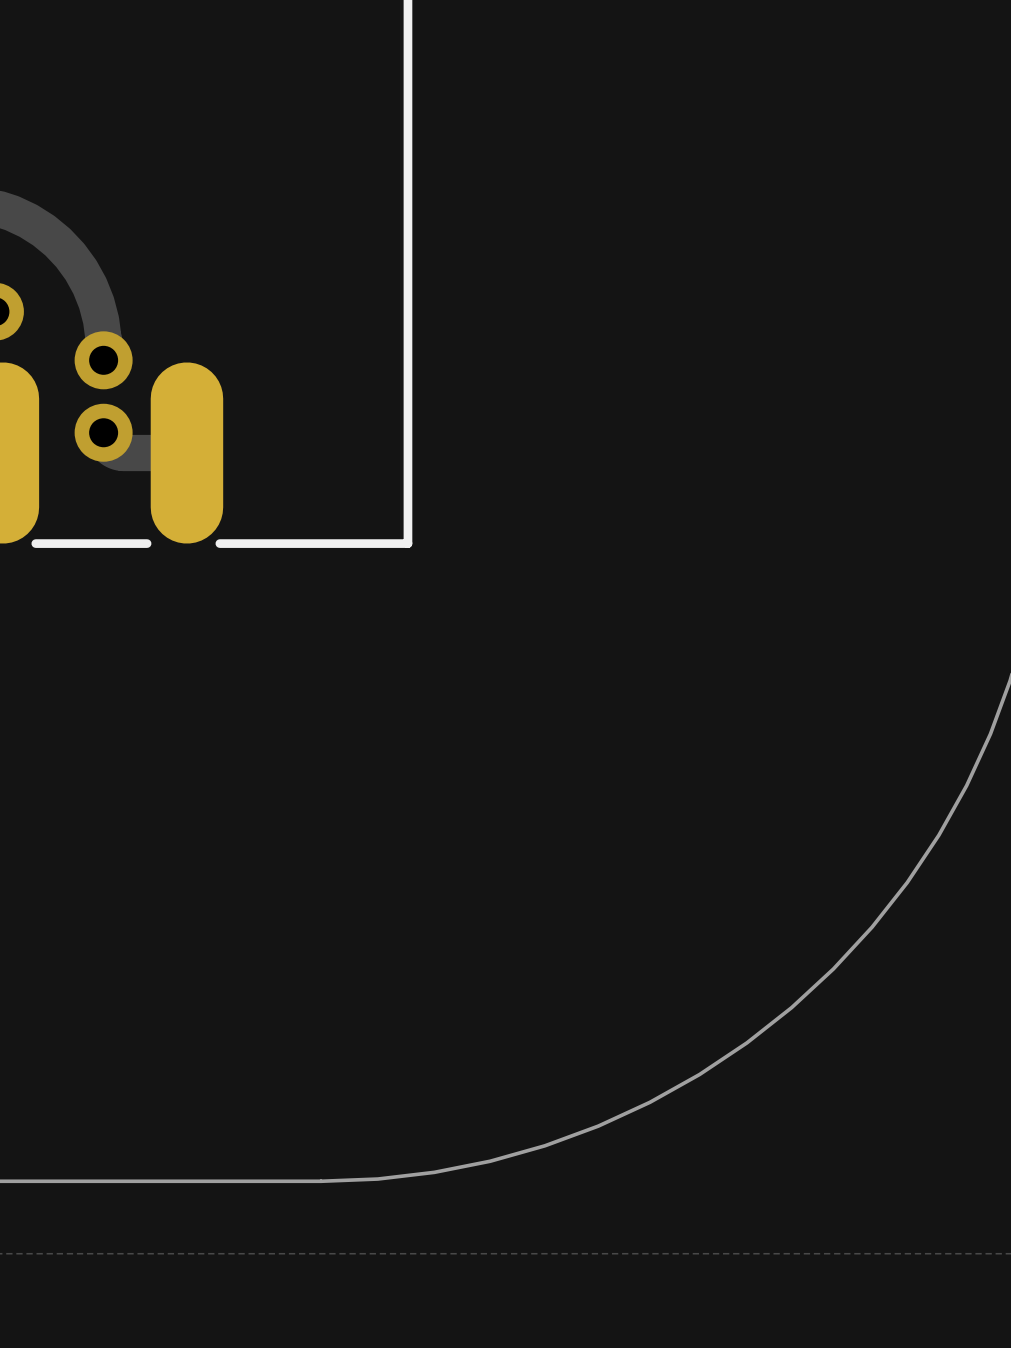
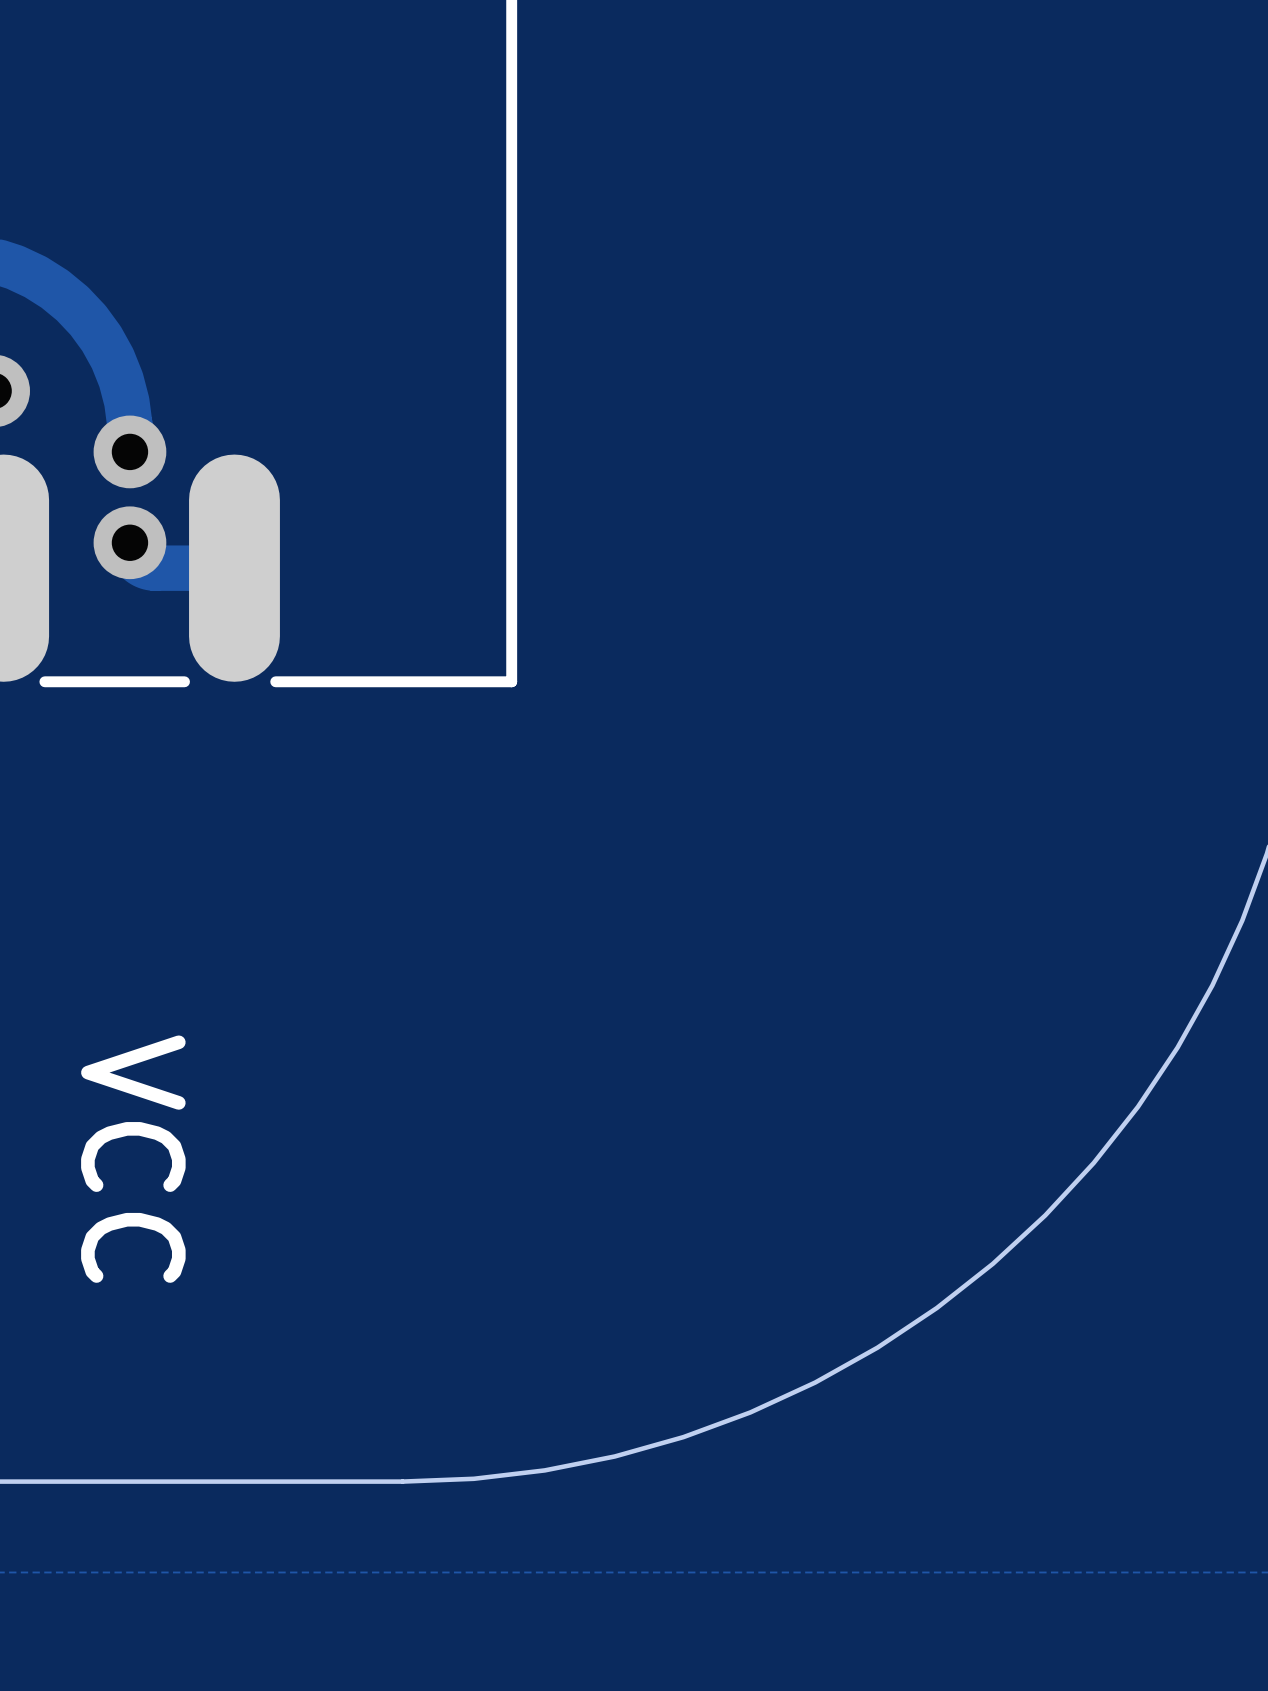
text: none -> VCC (133, 1159)

